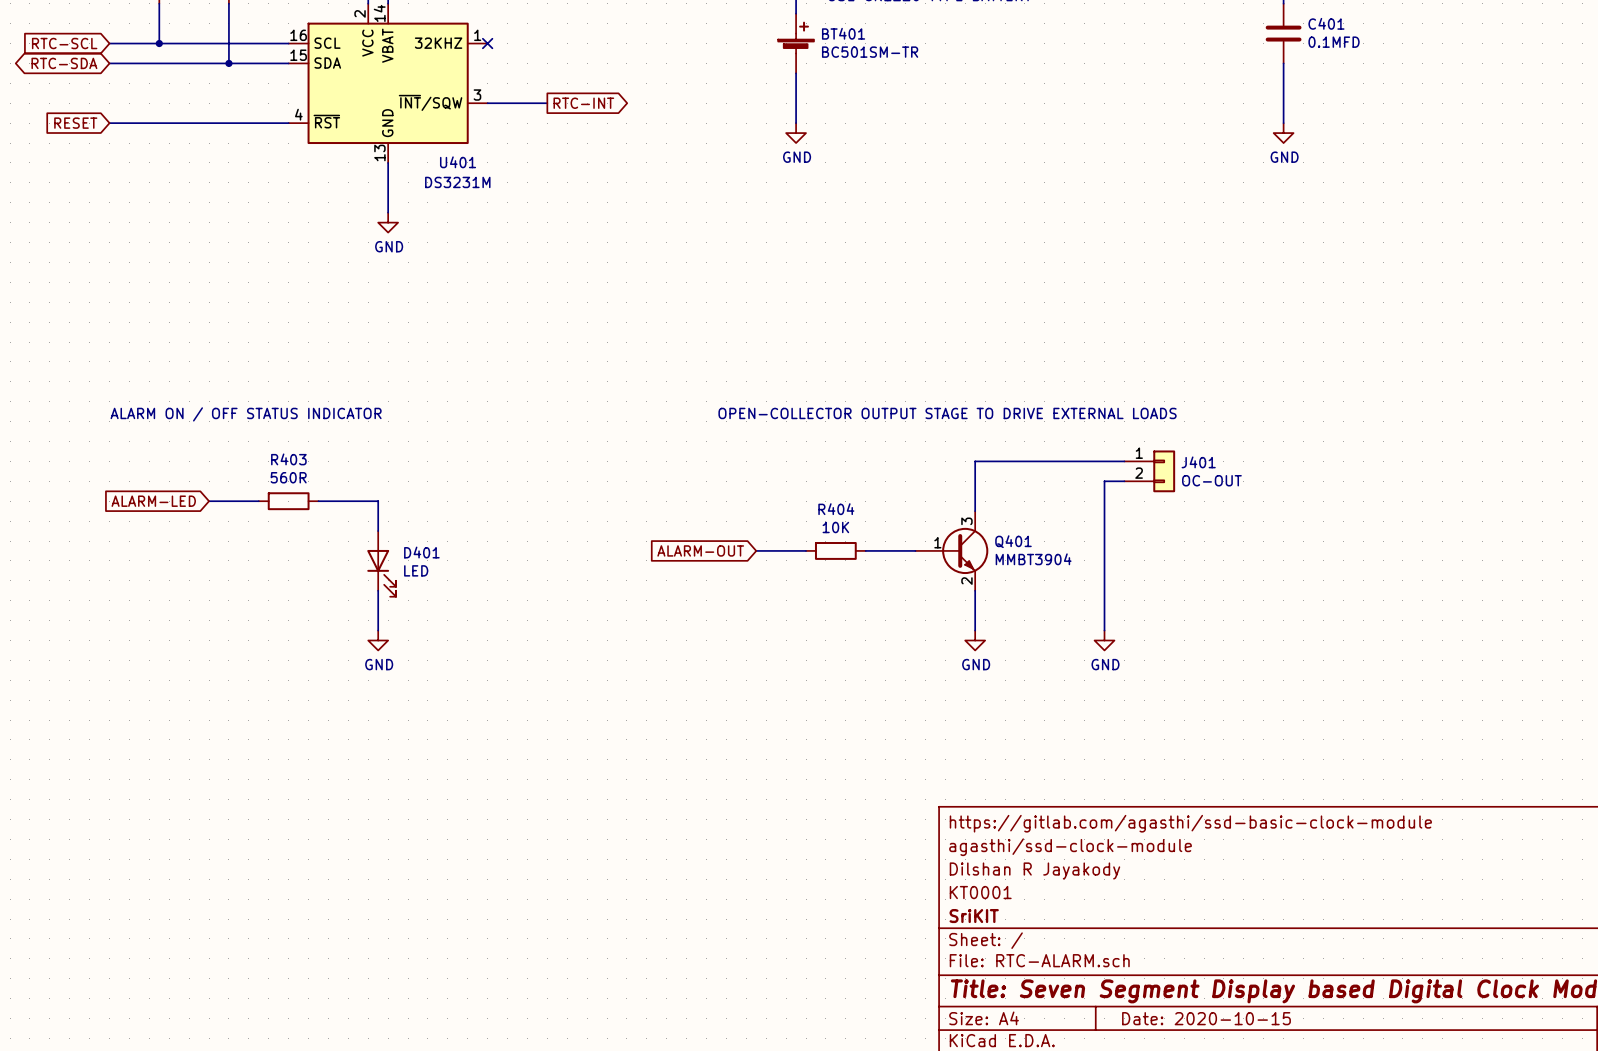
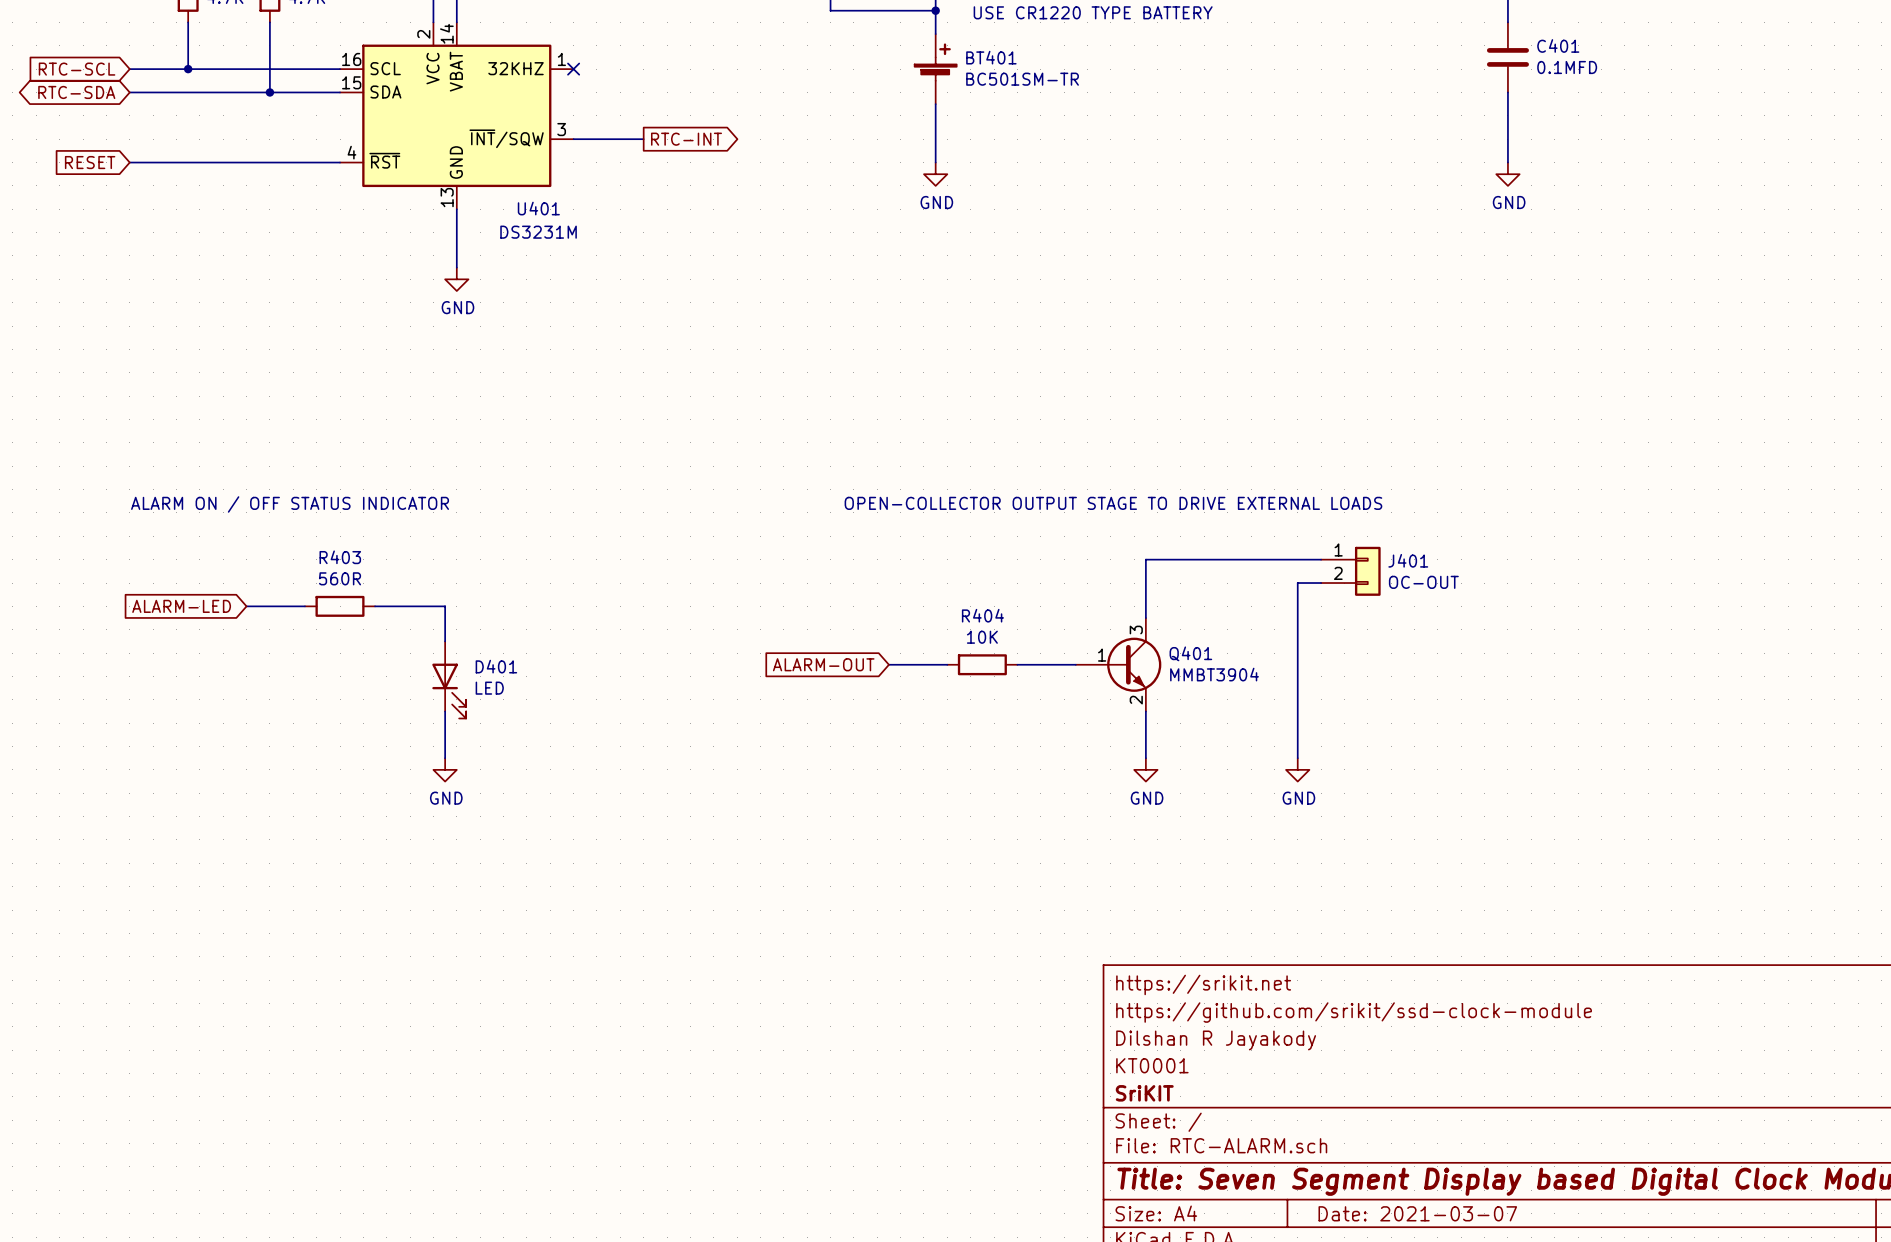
title block: https://gitlab.com/agasthi/ssd-basic-clock-module (1190, 823) -> https://srikit.net (1203, 984)
title block: agasthi/ssd-clock-module (1070, 847) -> https://github.com/srikit/ssd-clock-module (1354, 1012)
title block: Date: 2020-10-15 (1206, 1018) -> Date: 2021-03-07 (1417, 1213)

